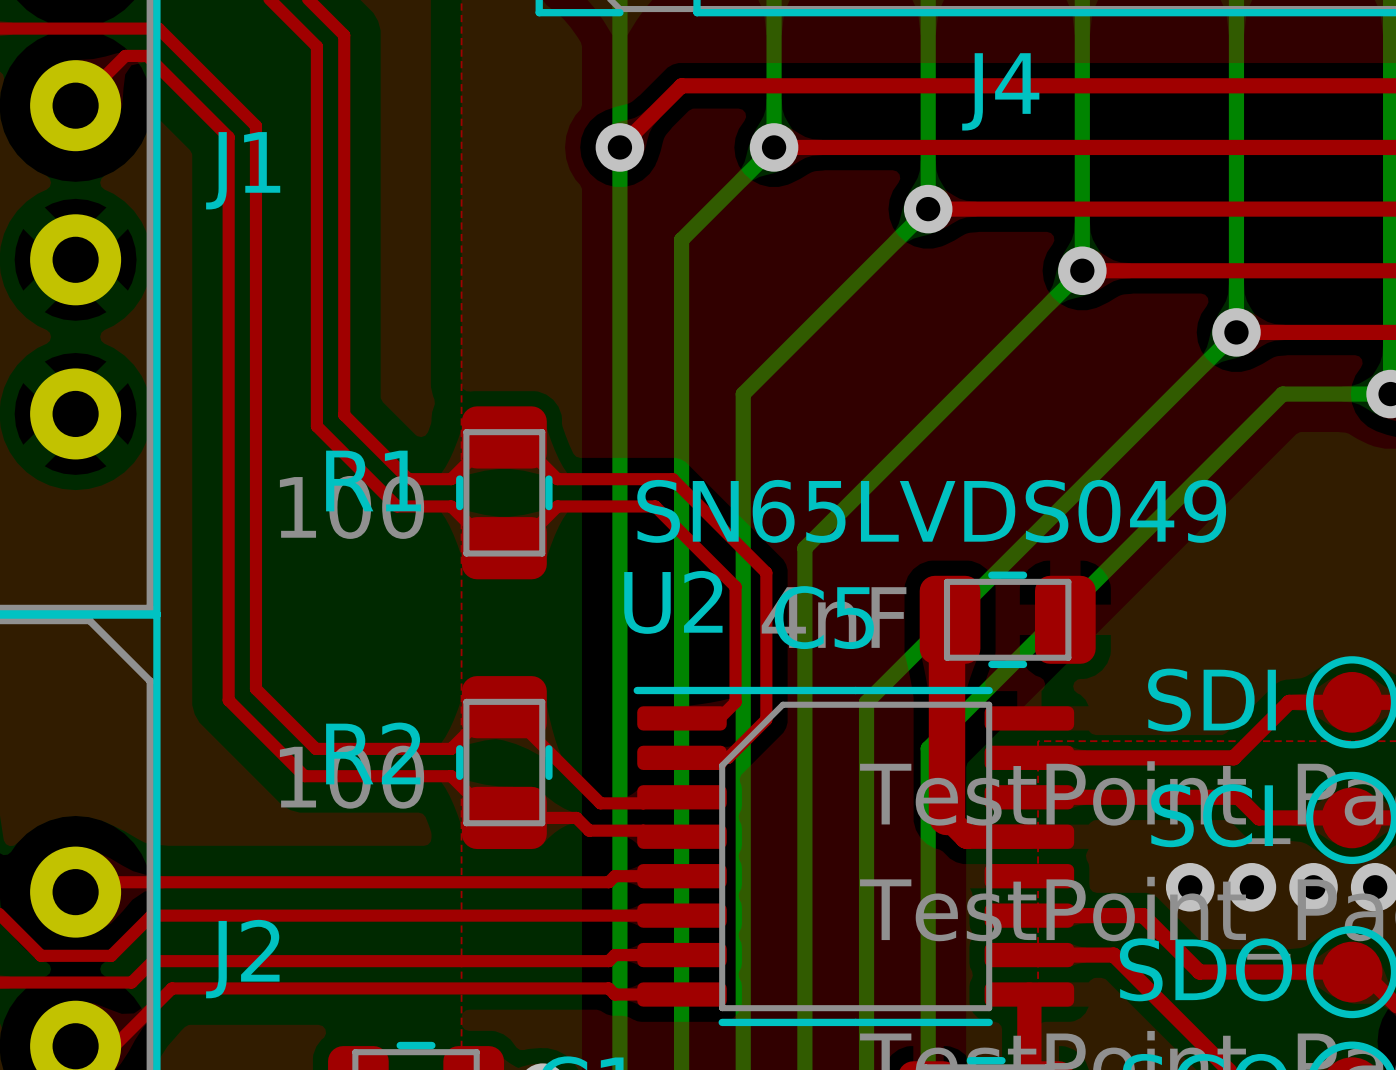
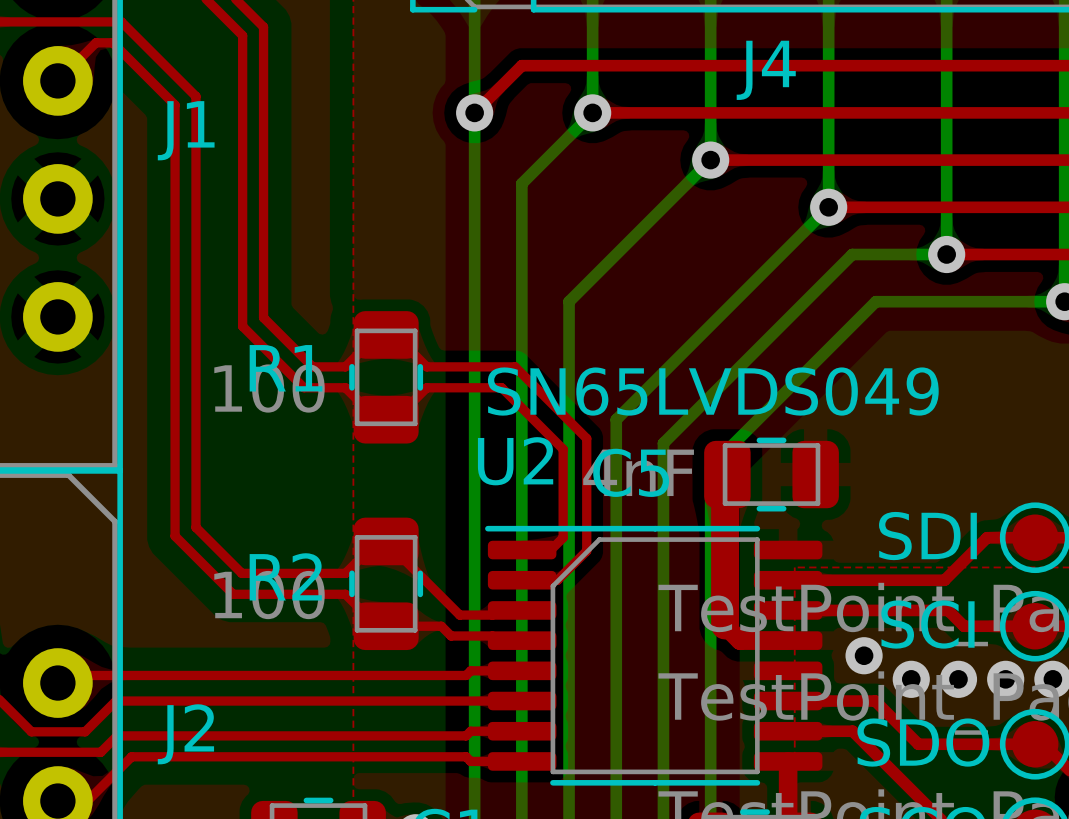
bottom track: (1236, 332) (866, 702) -> (946, 254) (852, 254) (663, 443) (663, 537)
bottom track: (1282, 394) (928, 748) -> (982, 301) (875, 301) (710, 466) (710, 573)
via: none -> (864, 655)

